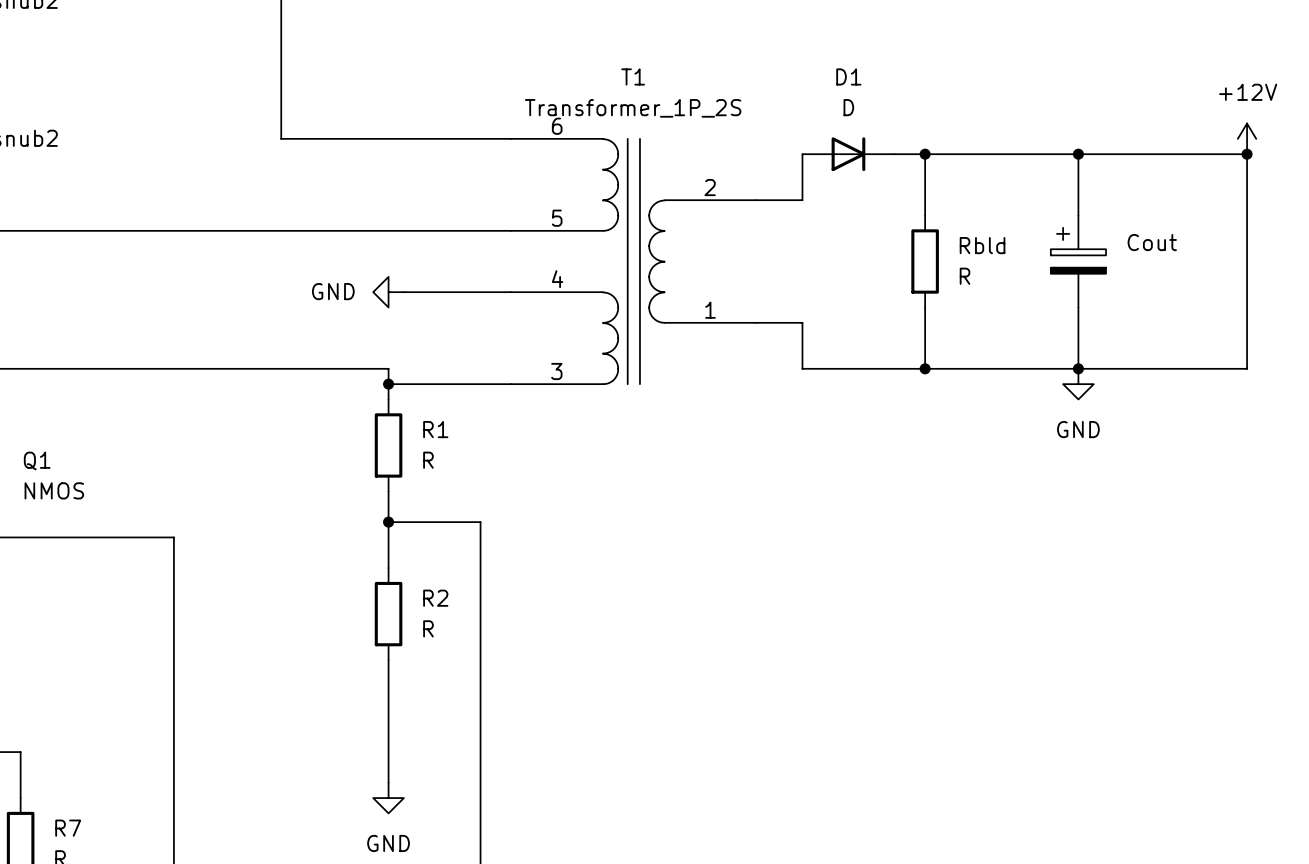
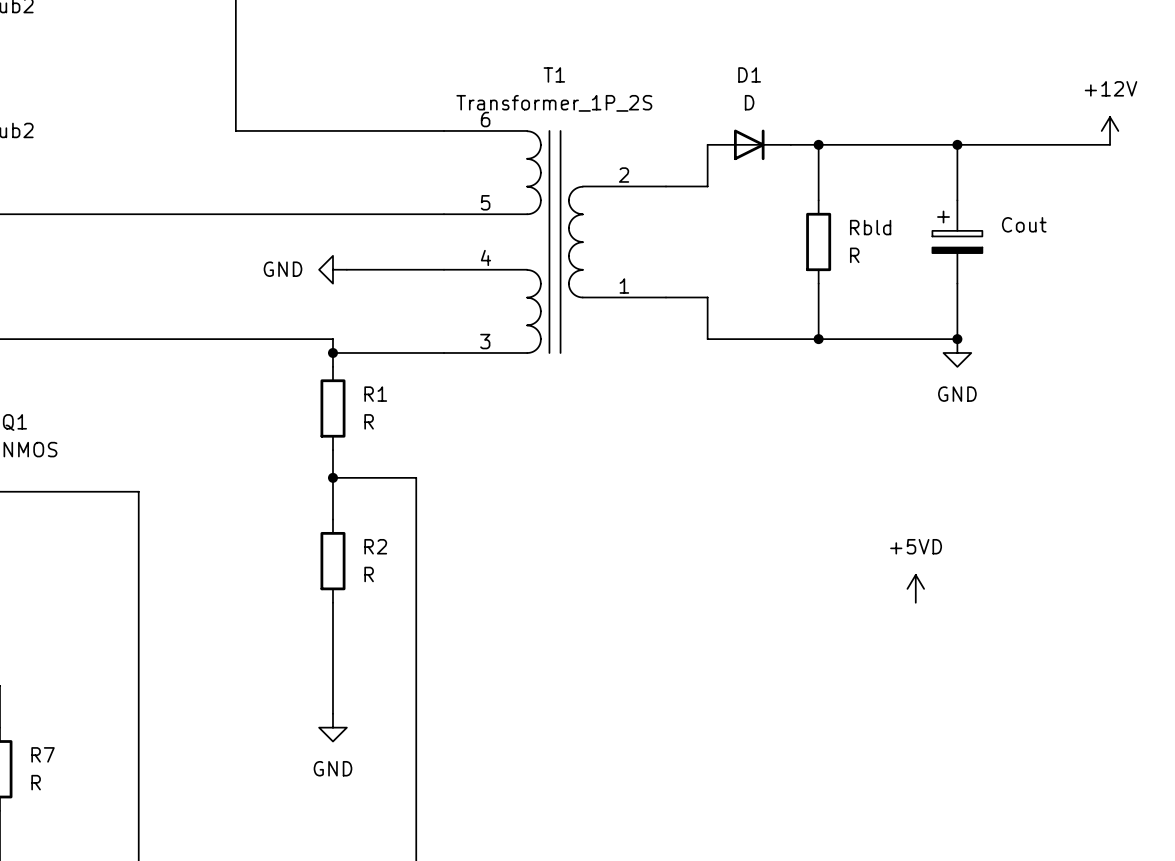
wire: (1247, 154) (1247, 368) (1078, 368) -> none
junction: (1247, 154) -> none
power symbol: none -> +5VD (915, 588)

